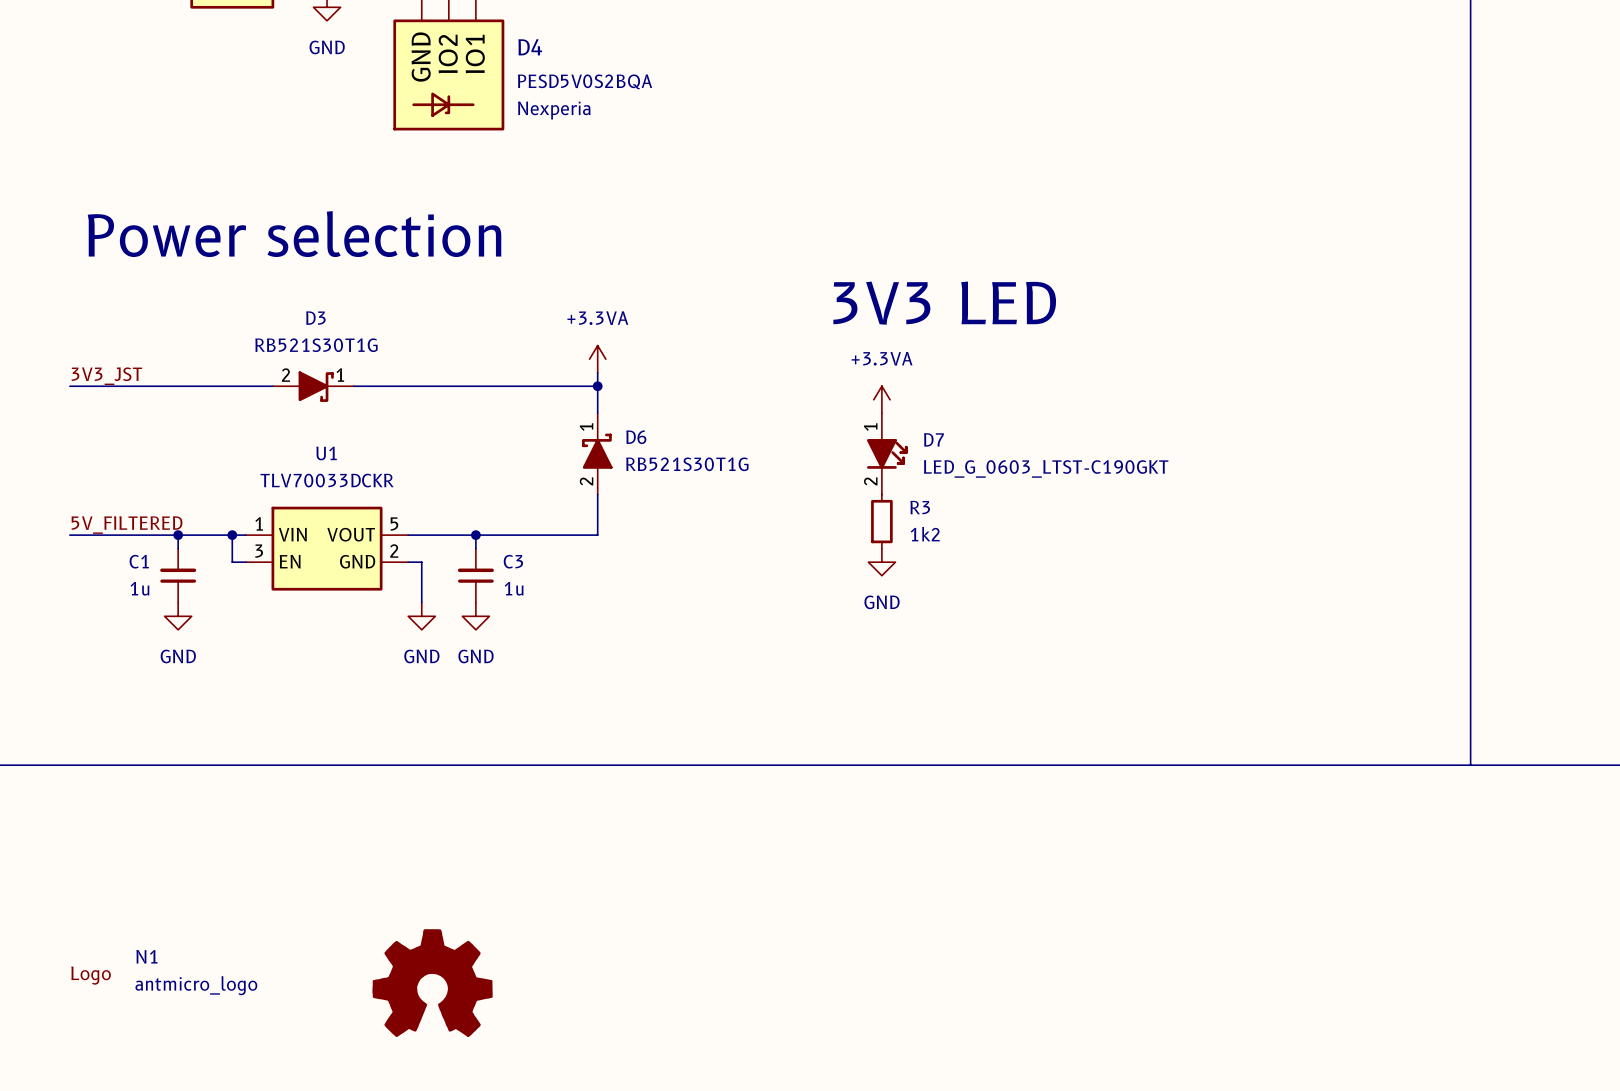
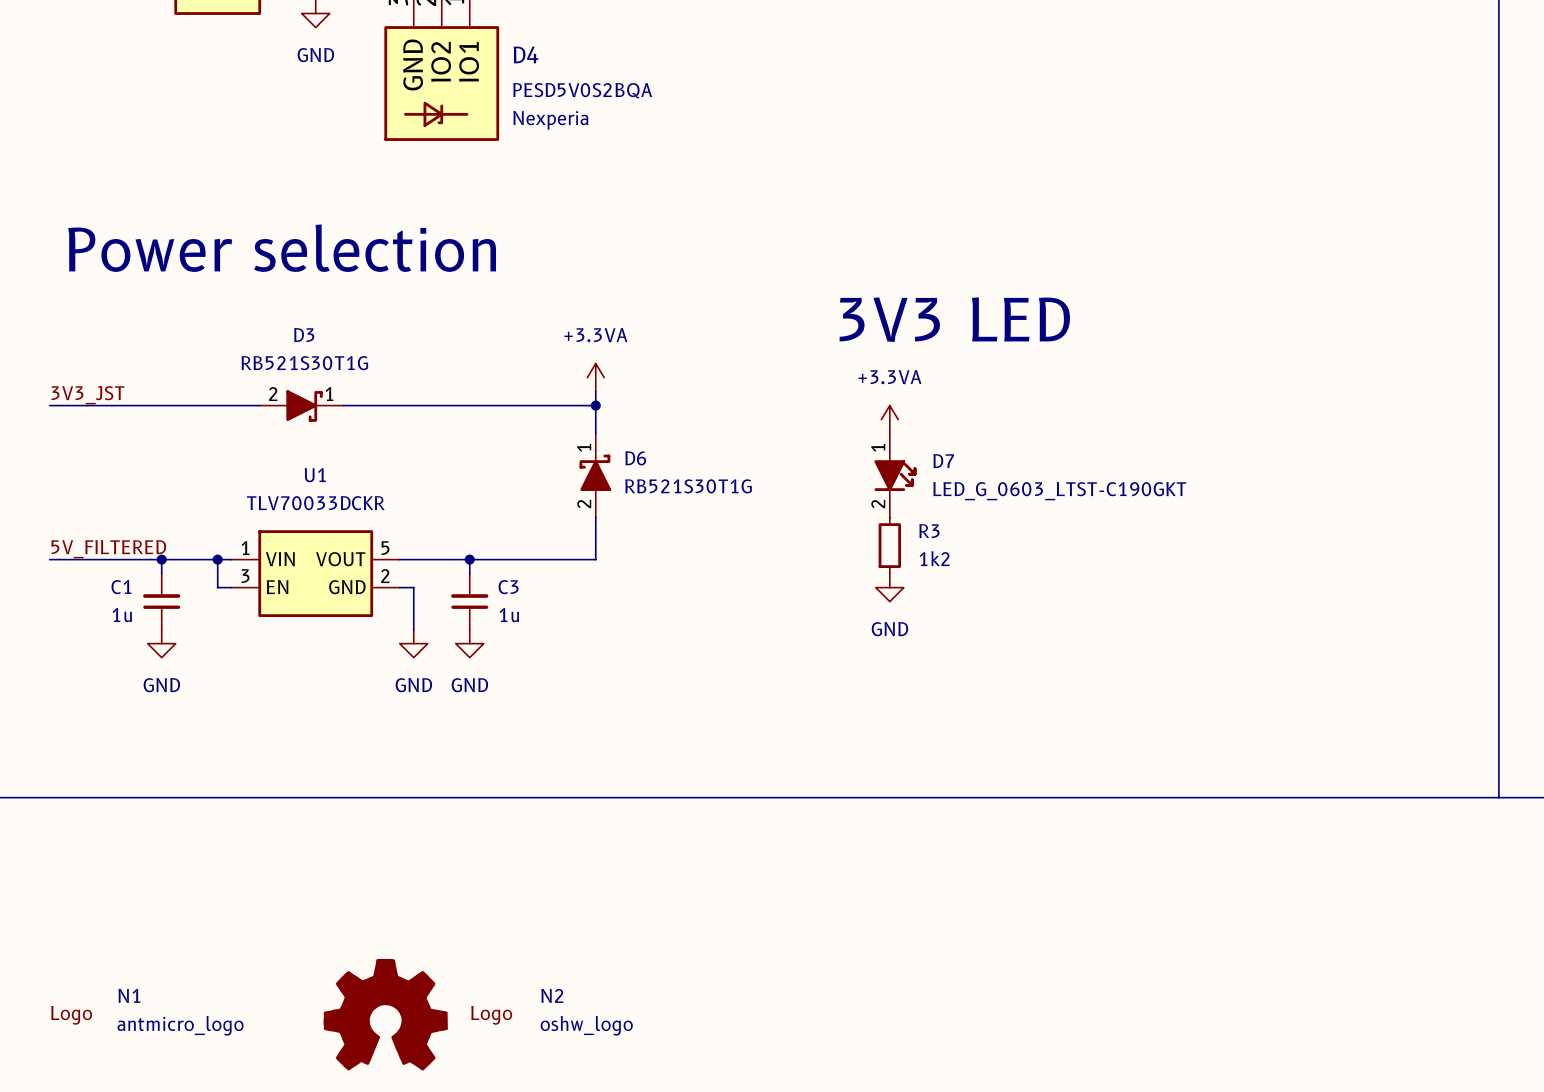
N2: none -> oshw_logo (552, 1012)
power symbol position: (432, 983) -> (385, 1014)

